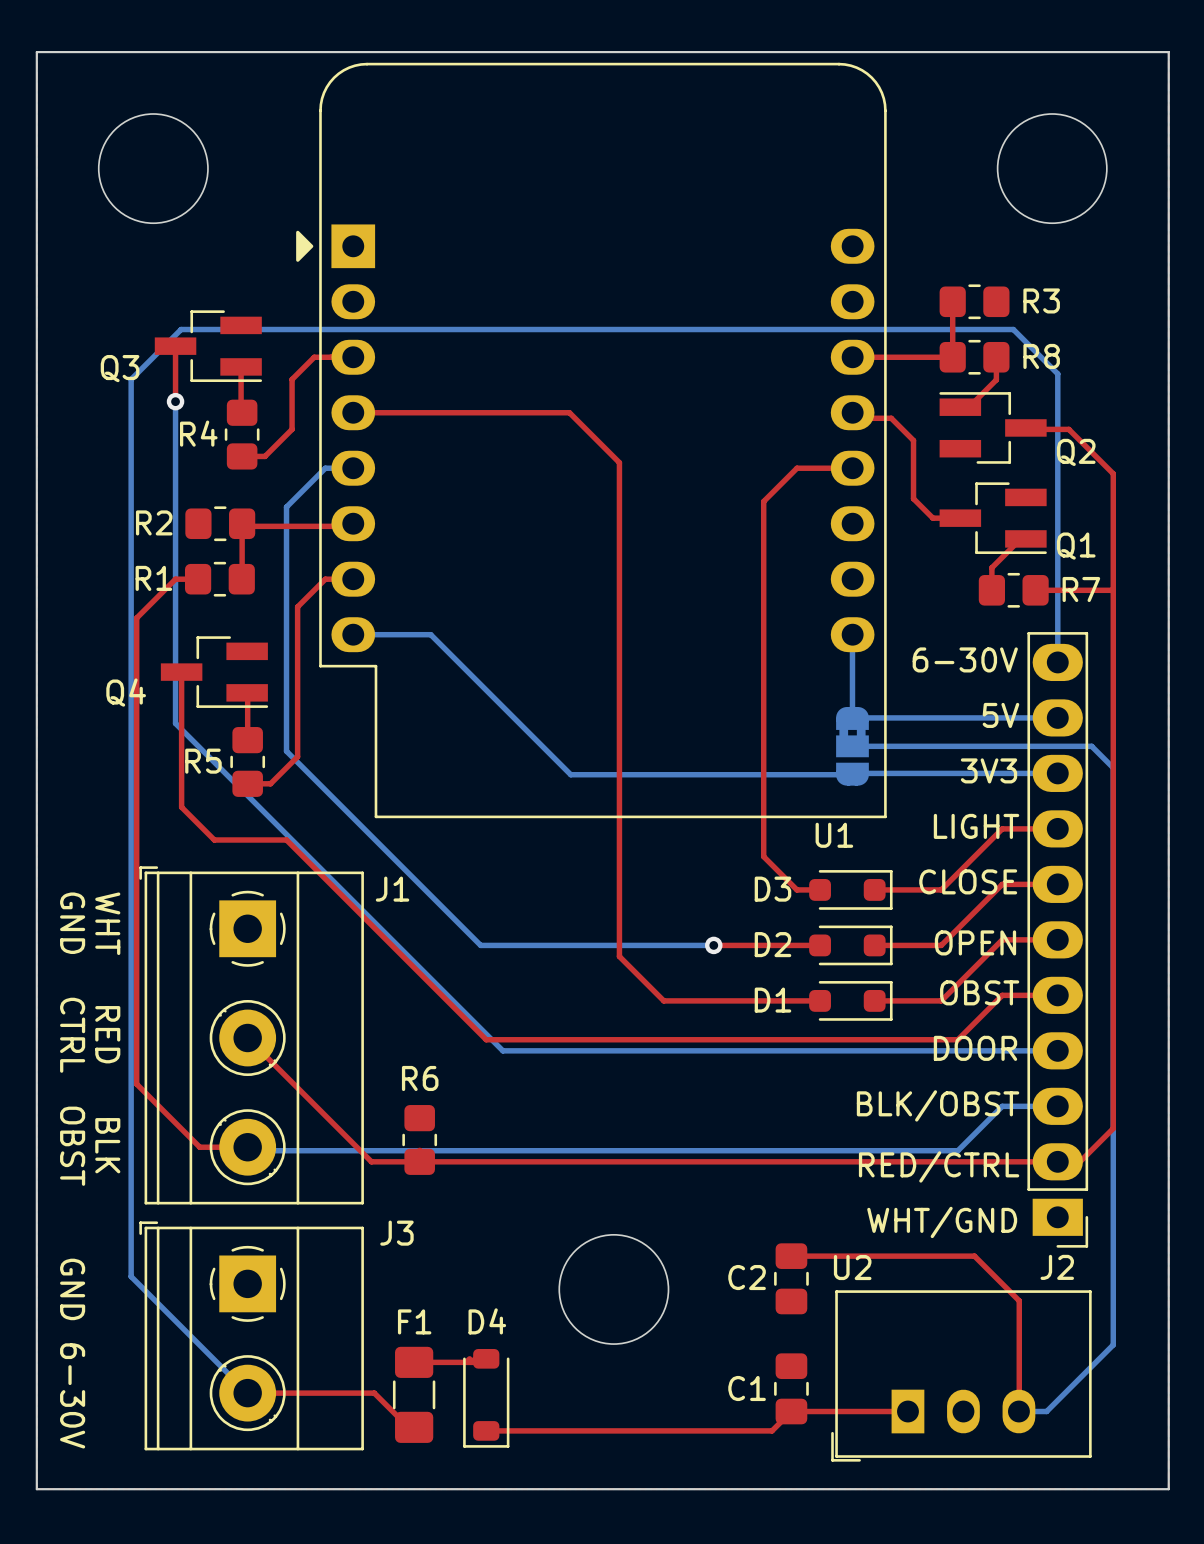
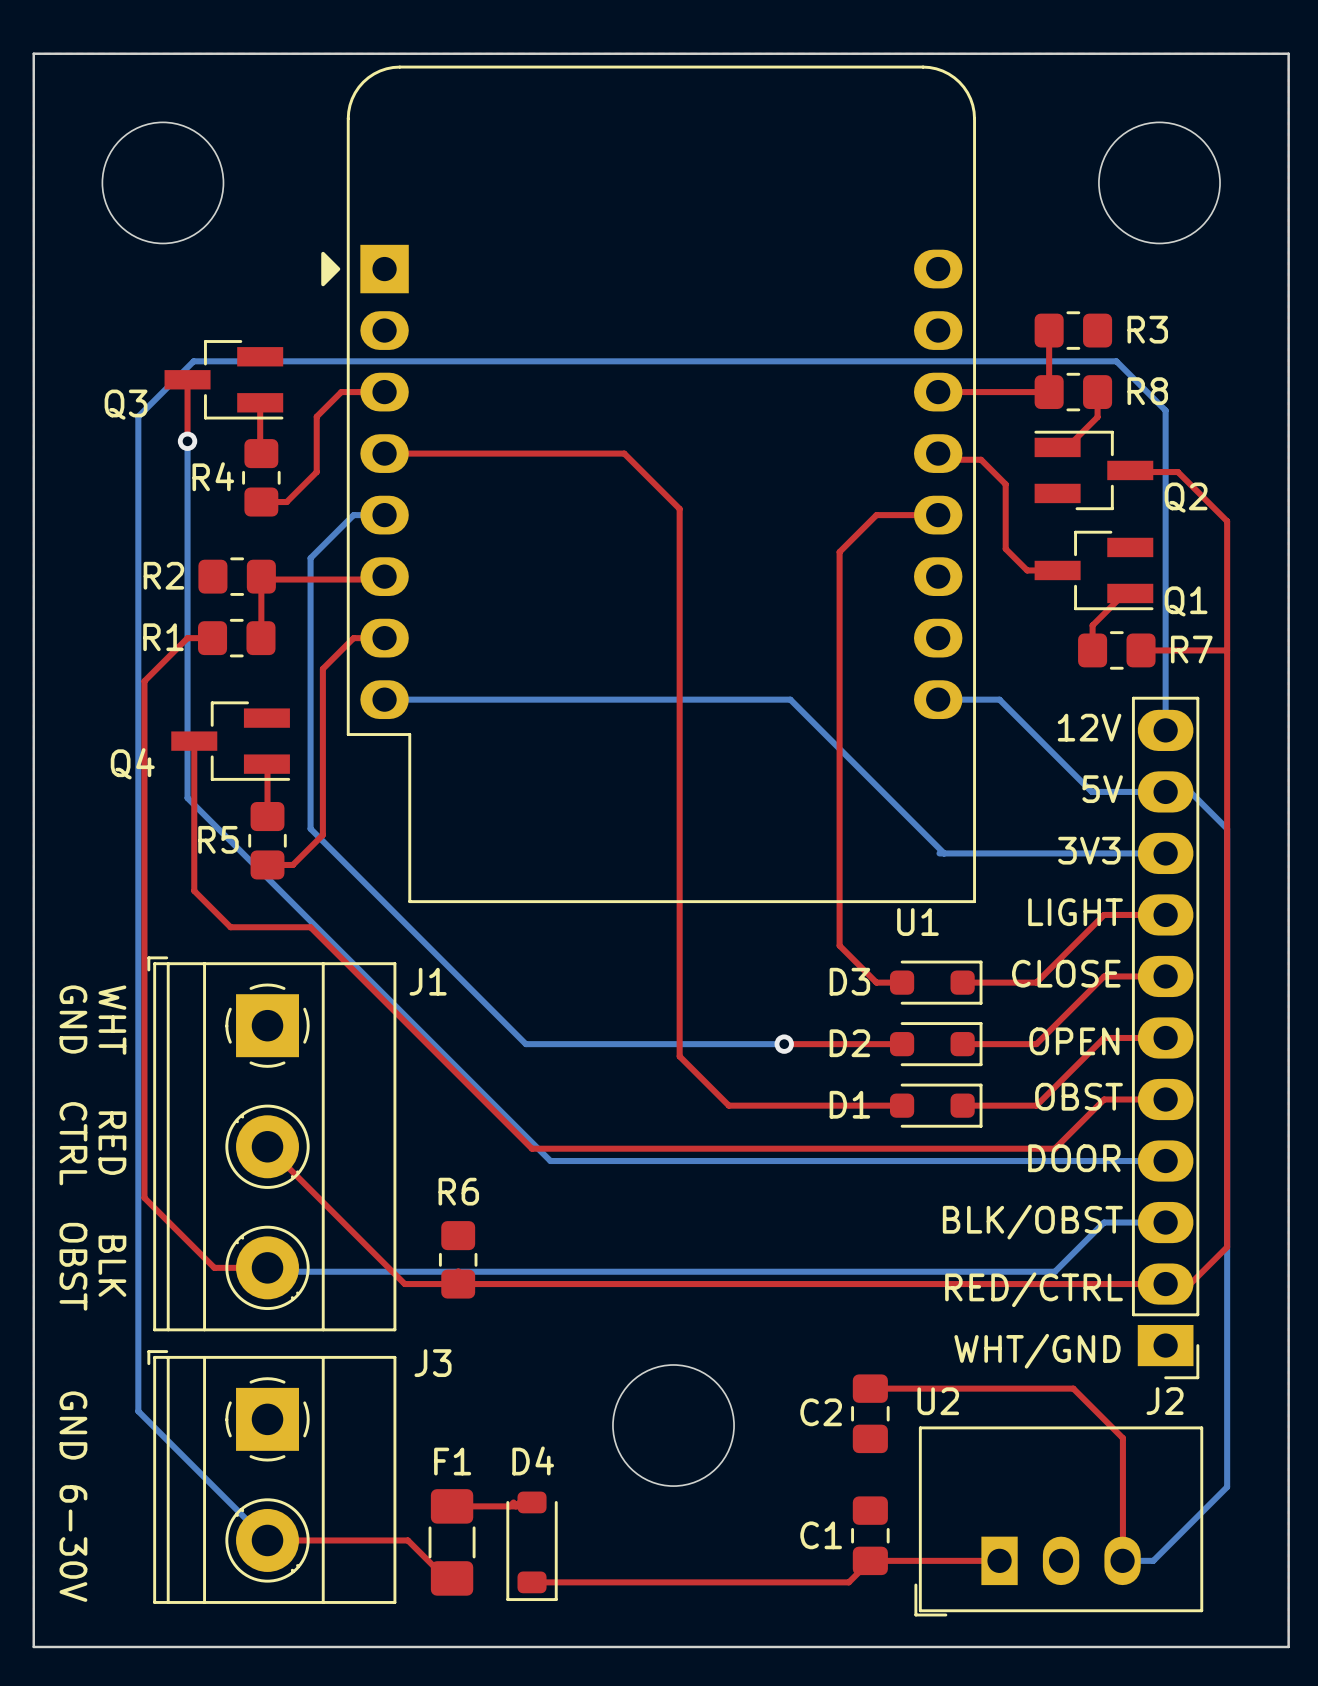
bottom track: (430, 634) (570, 774) (852, 774) -> (470, 699) (790, 699) (944, 853)
bottom track: (852, 634) (852, 717) (991, 717) -> (938, 699) (999, 699) (1091, 791)
text: 6-30V (965, 659) -> none
text: none -> 12V (1089, 727)
bottom track: (852, 746) (1091, 746) (1113, 767) -> (1190, 791) (1227, 828) (1227, 847)
part: (852, 746) -> none

